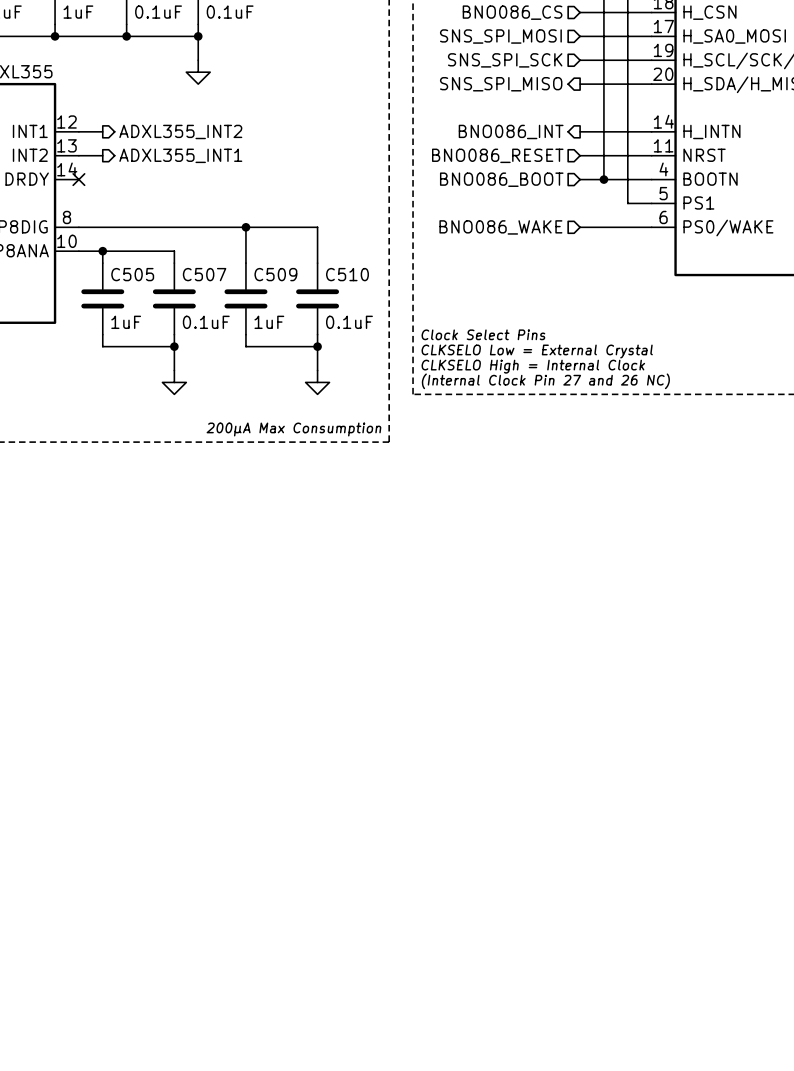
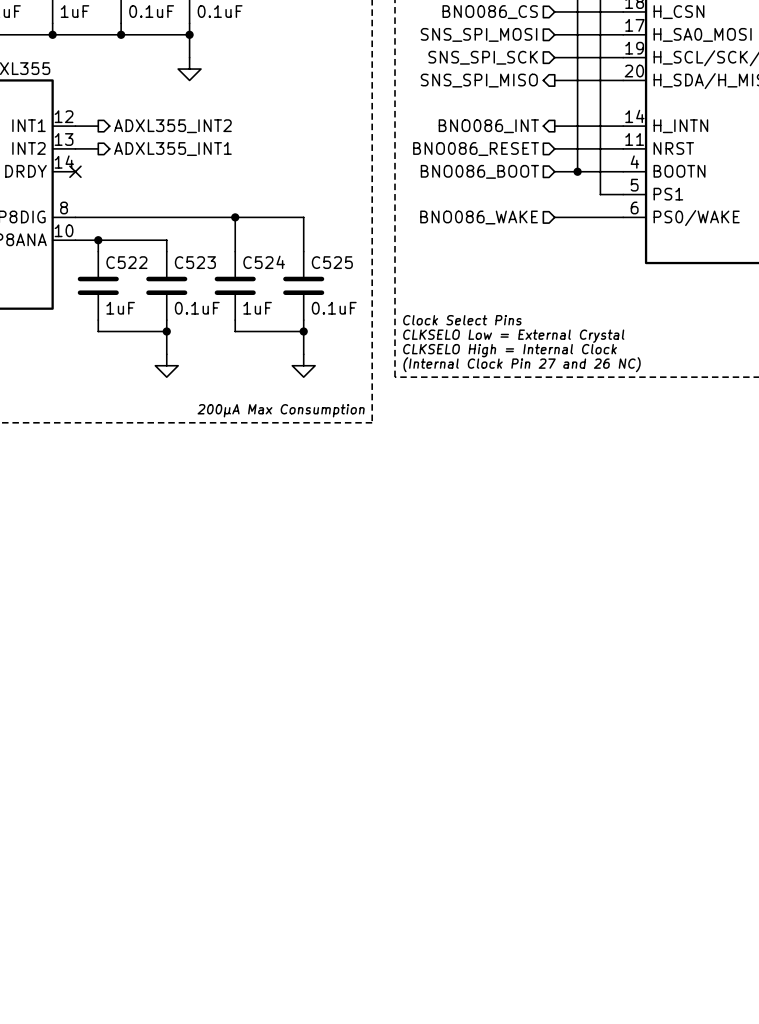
C505 name: C505 (132, 274) -> C522 (126, 262)
C507 name: C507 (204, 274) -> C523 (195, 262)
C509 name: C509 (275, 274) -> C524 (264, 262)
C510 name: C510 (347, 274) -> C525 (332, 262)

